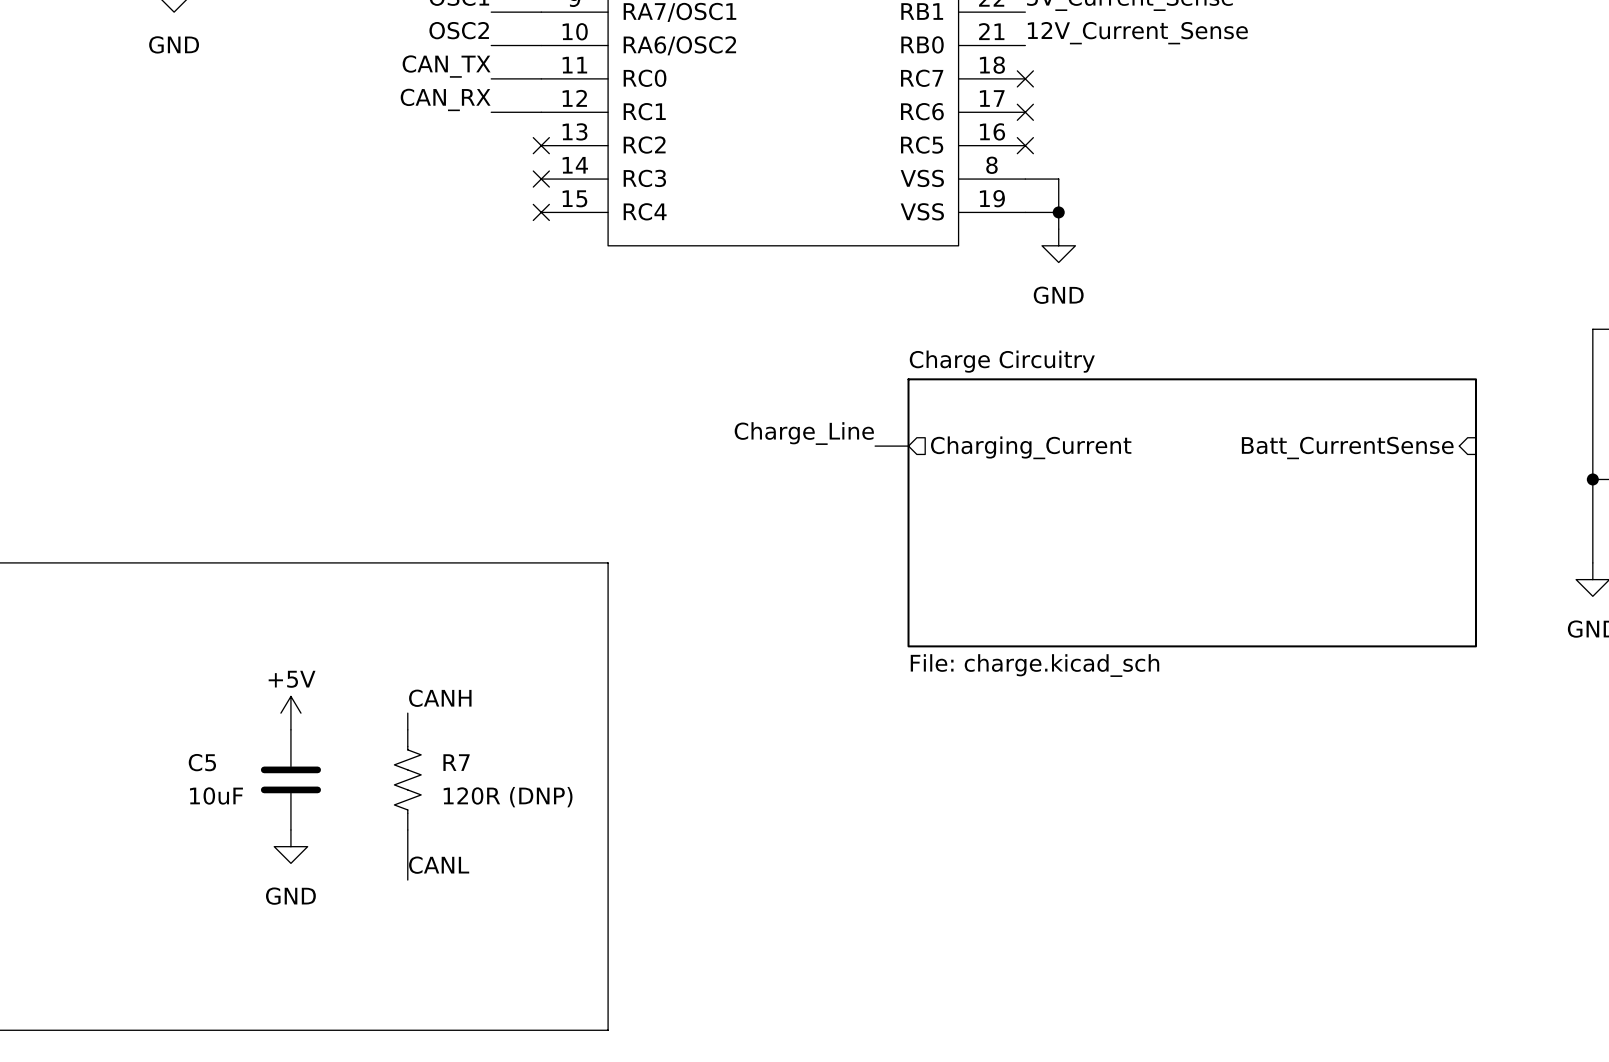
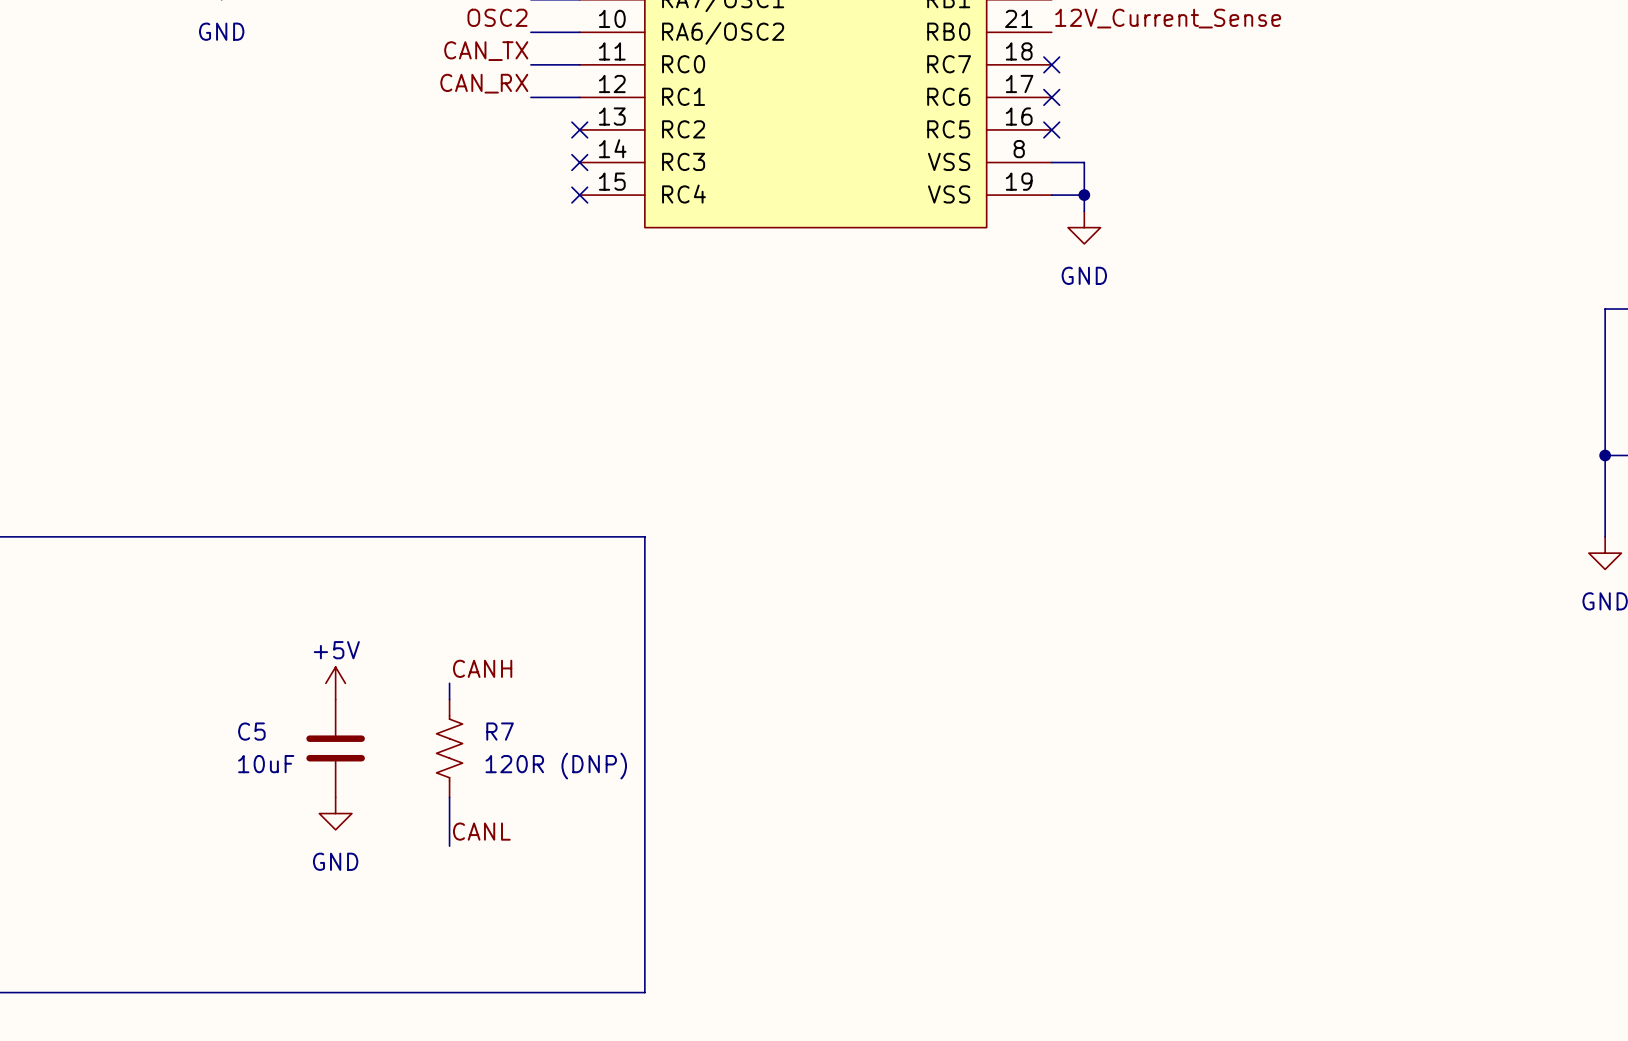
label: Charge_Line (804, 433) -> none
wire: (875, 446) (908, 446) -> none
sheet pin: Charging_Current (1031, 447) -> none
sheet pin: Batt_CurrentSense (1347, 448) -> none
sheet Charge Circuitry: File: charge.kicad_sch (1192, 512) -> none

